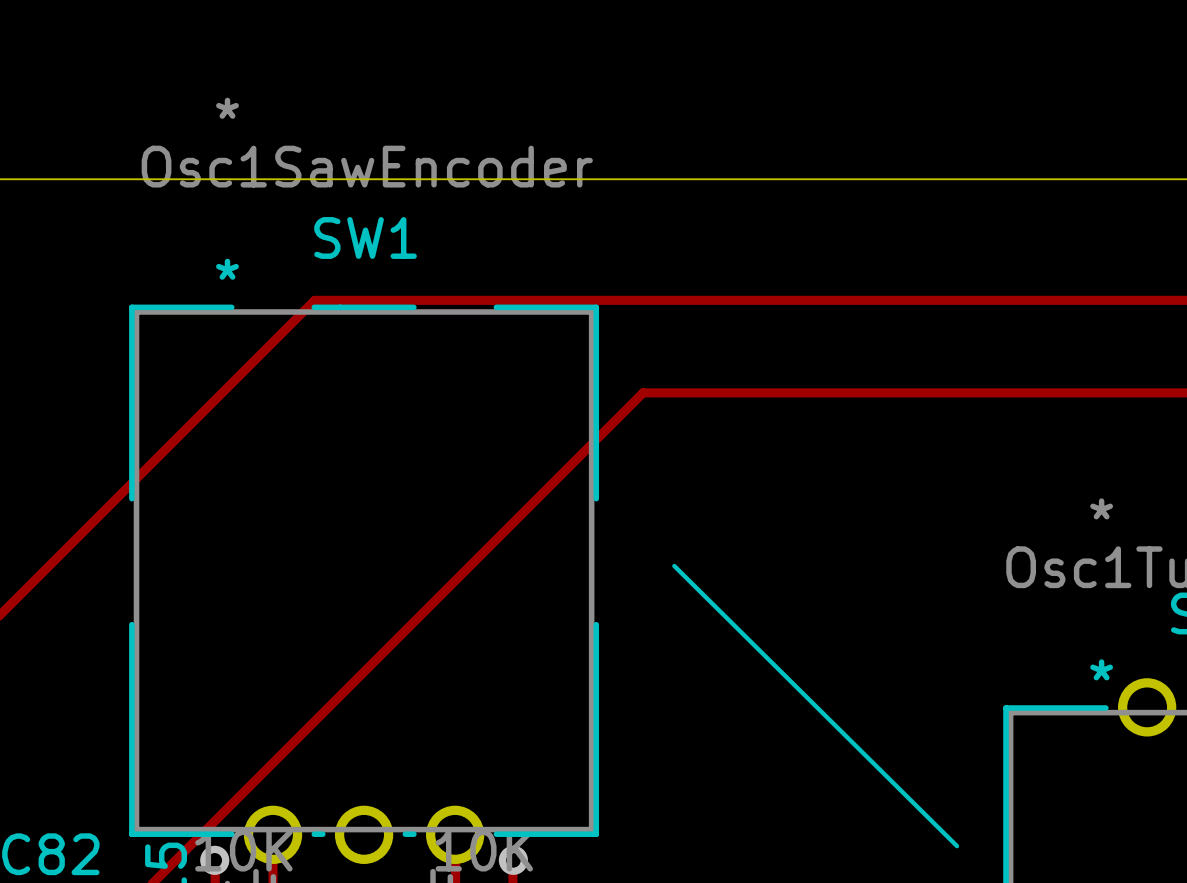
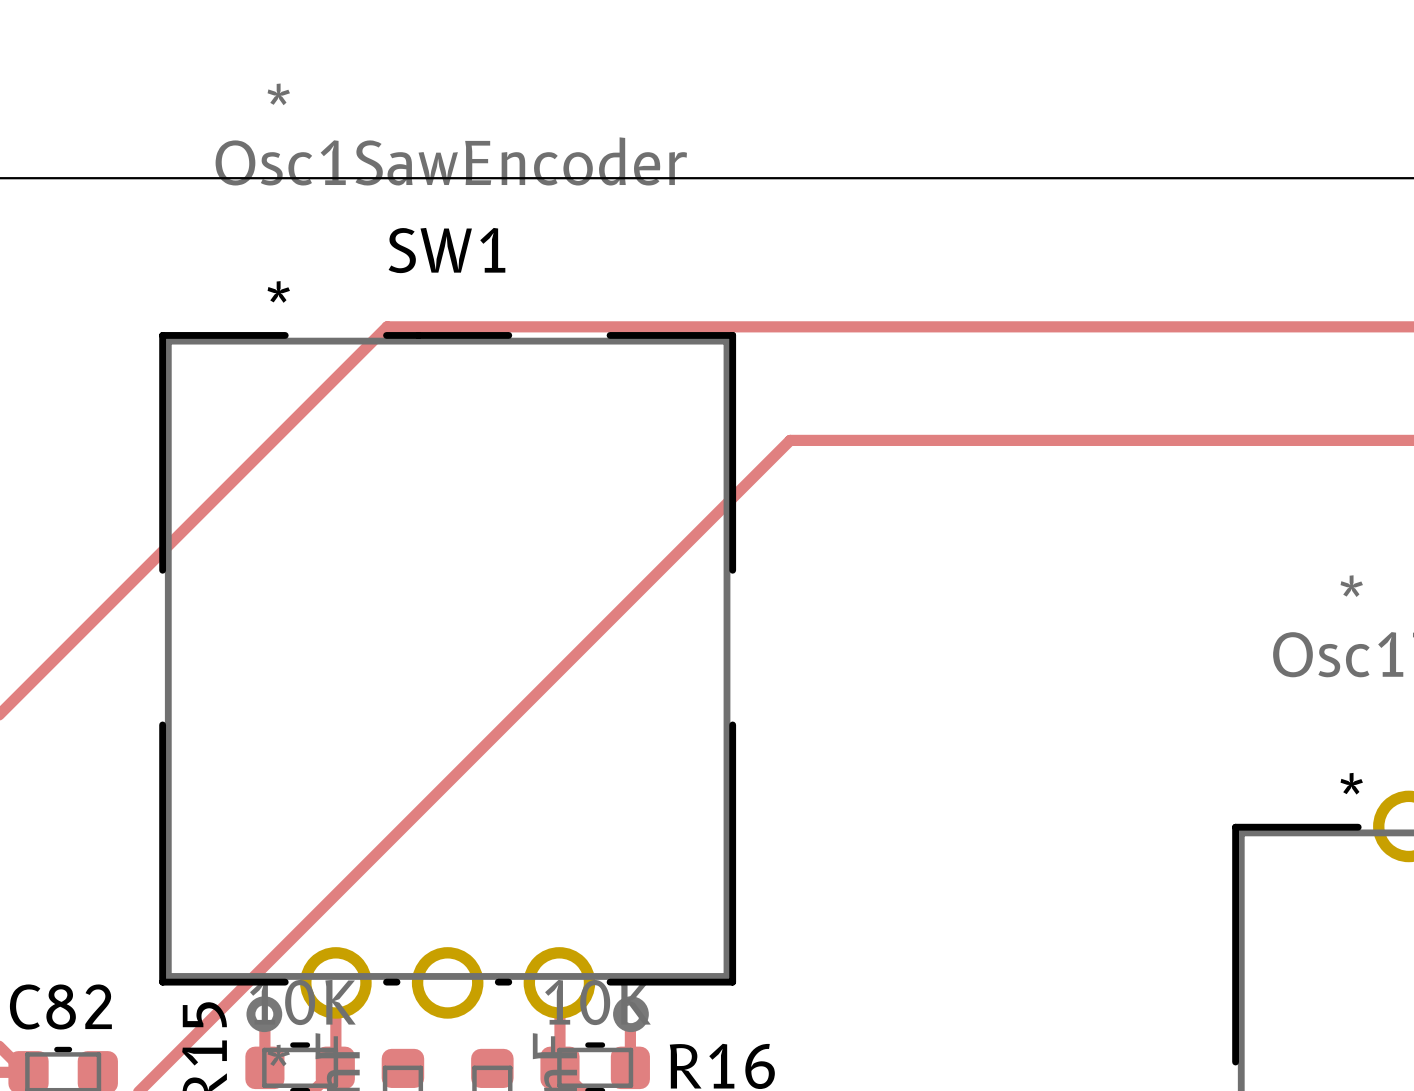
line: (674, 566) (957, 846) -> none

